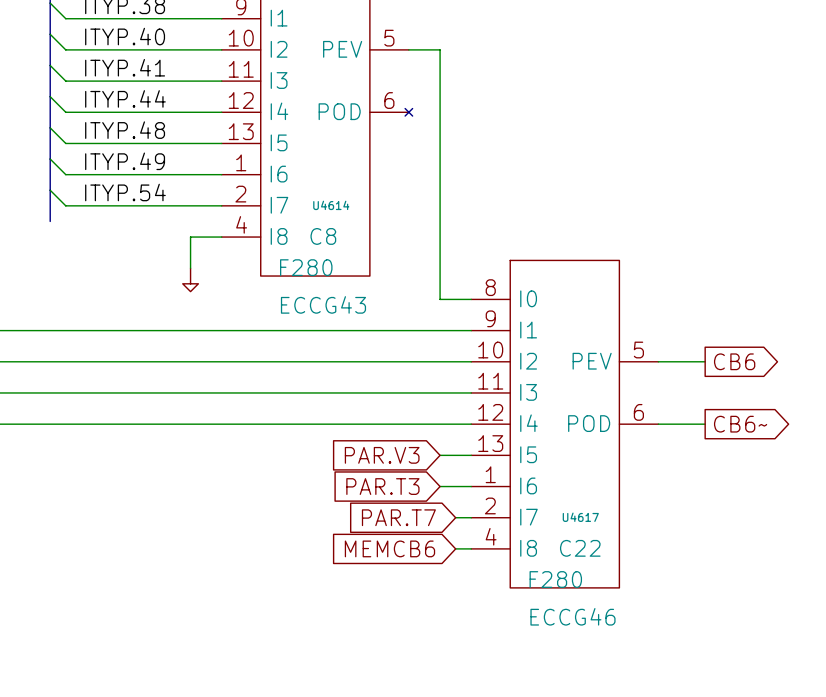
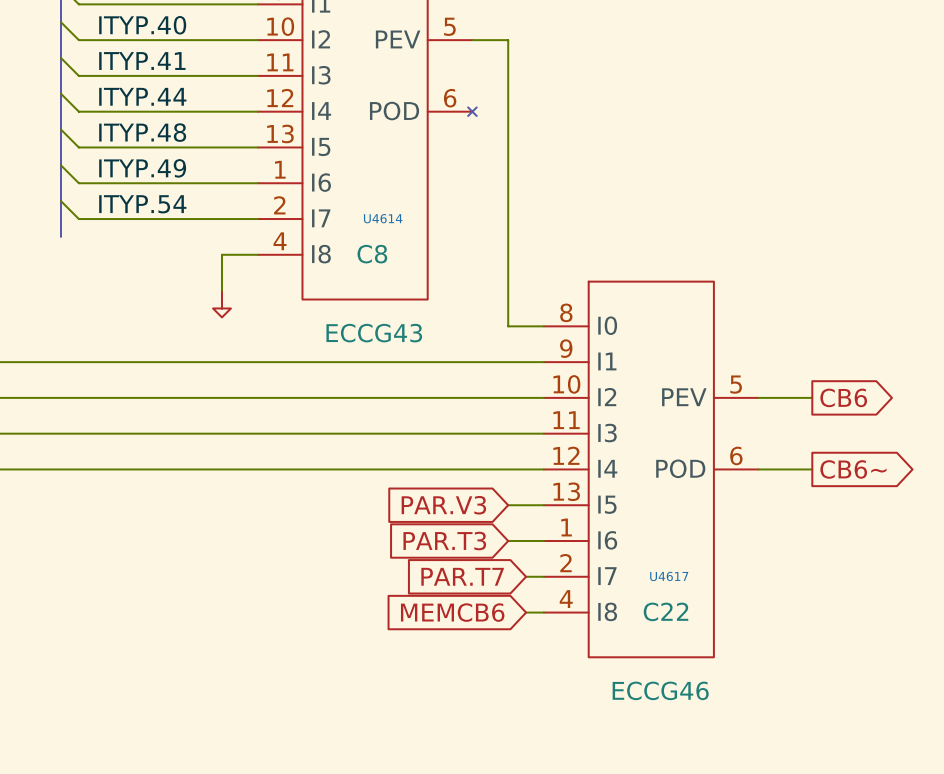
U4614 value: F280 (306, 267) -> none
U4617 value: F280 (555, 579) -> none

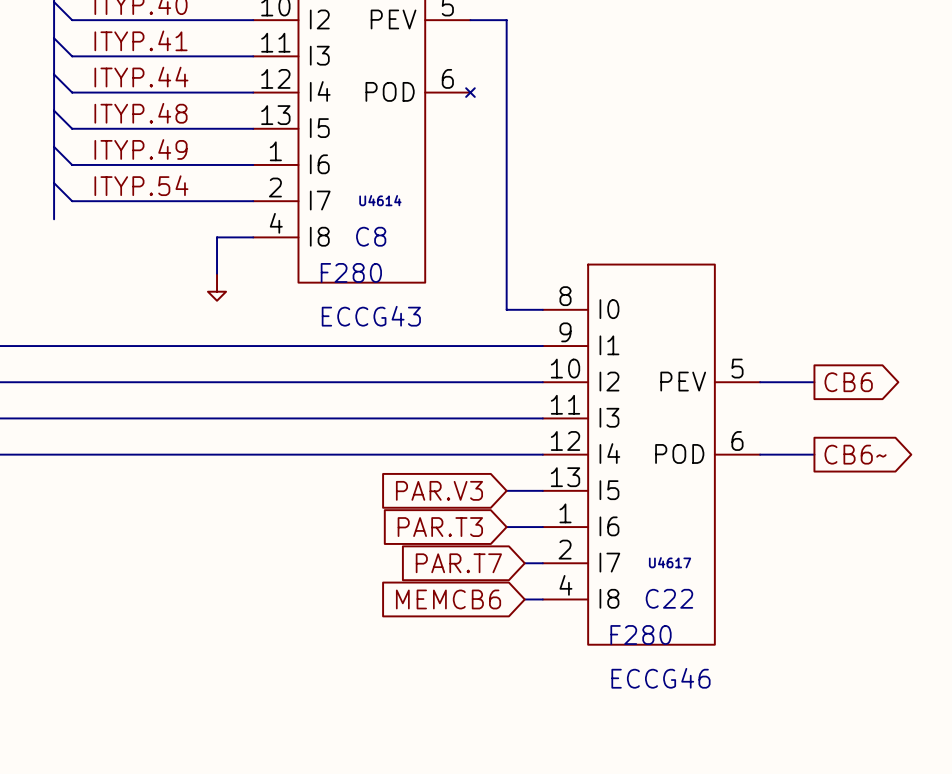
U4614 value: none -> F280 (351, 272)
U4617 value: none -> F280 (641, 635)

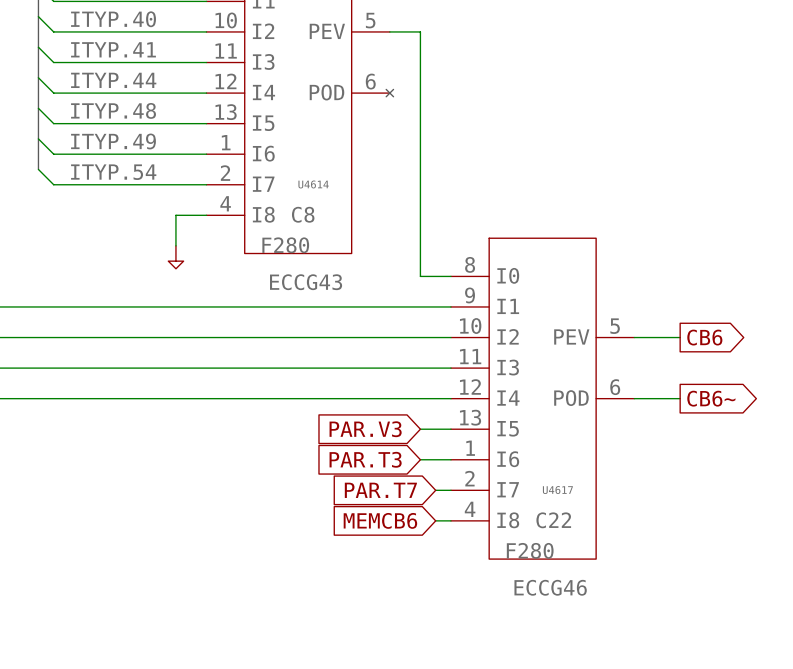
bus: (54, 183) (54, 219) -> none

